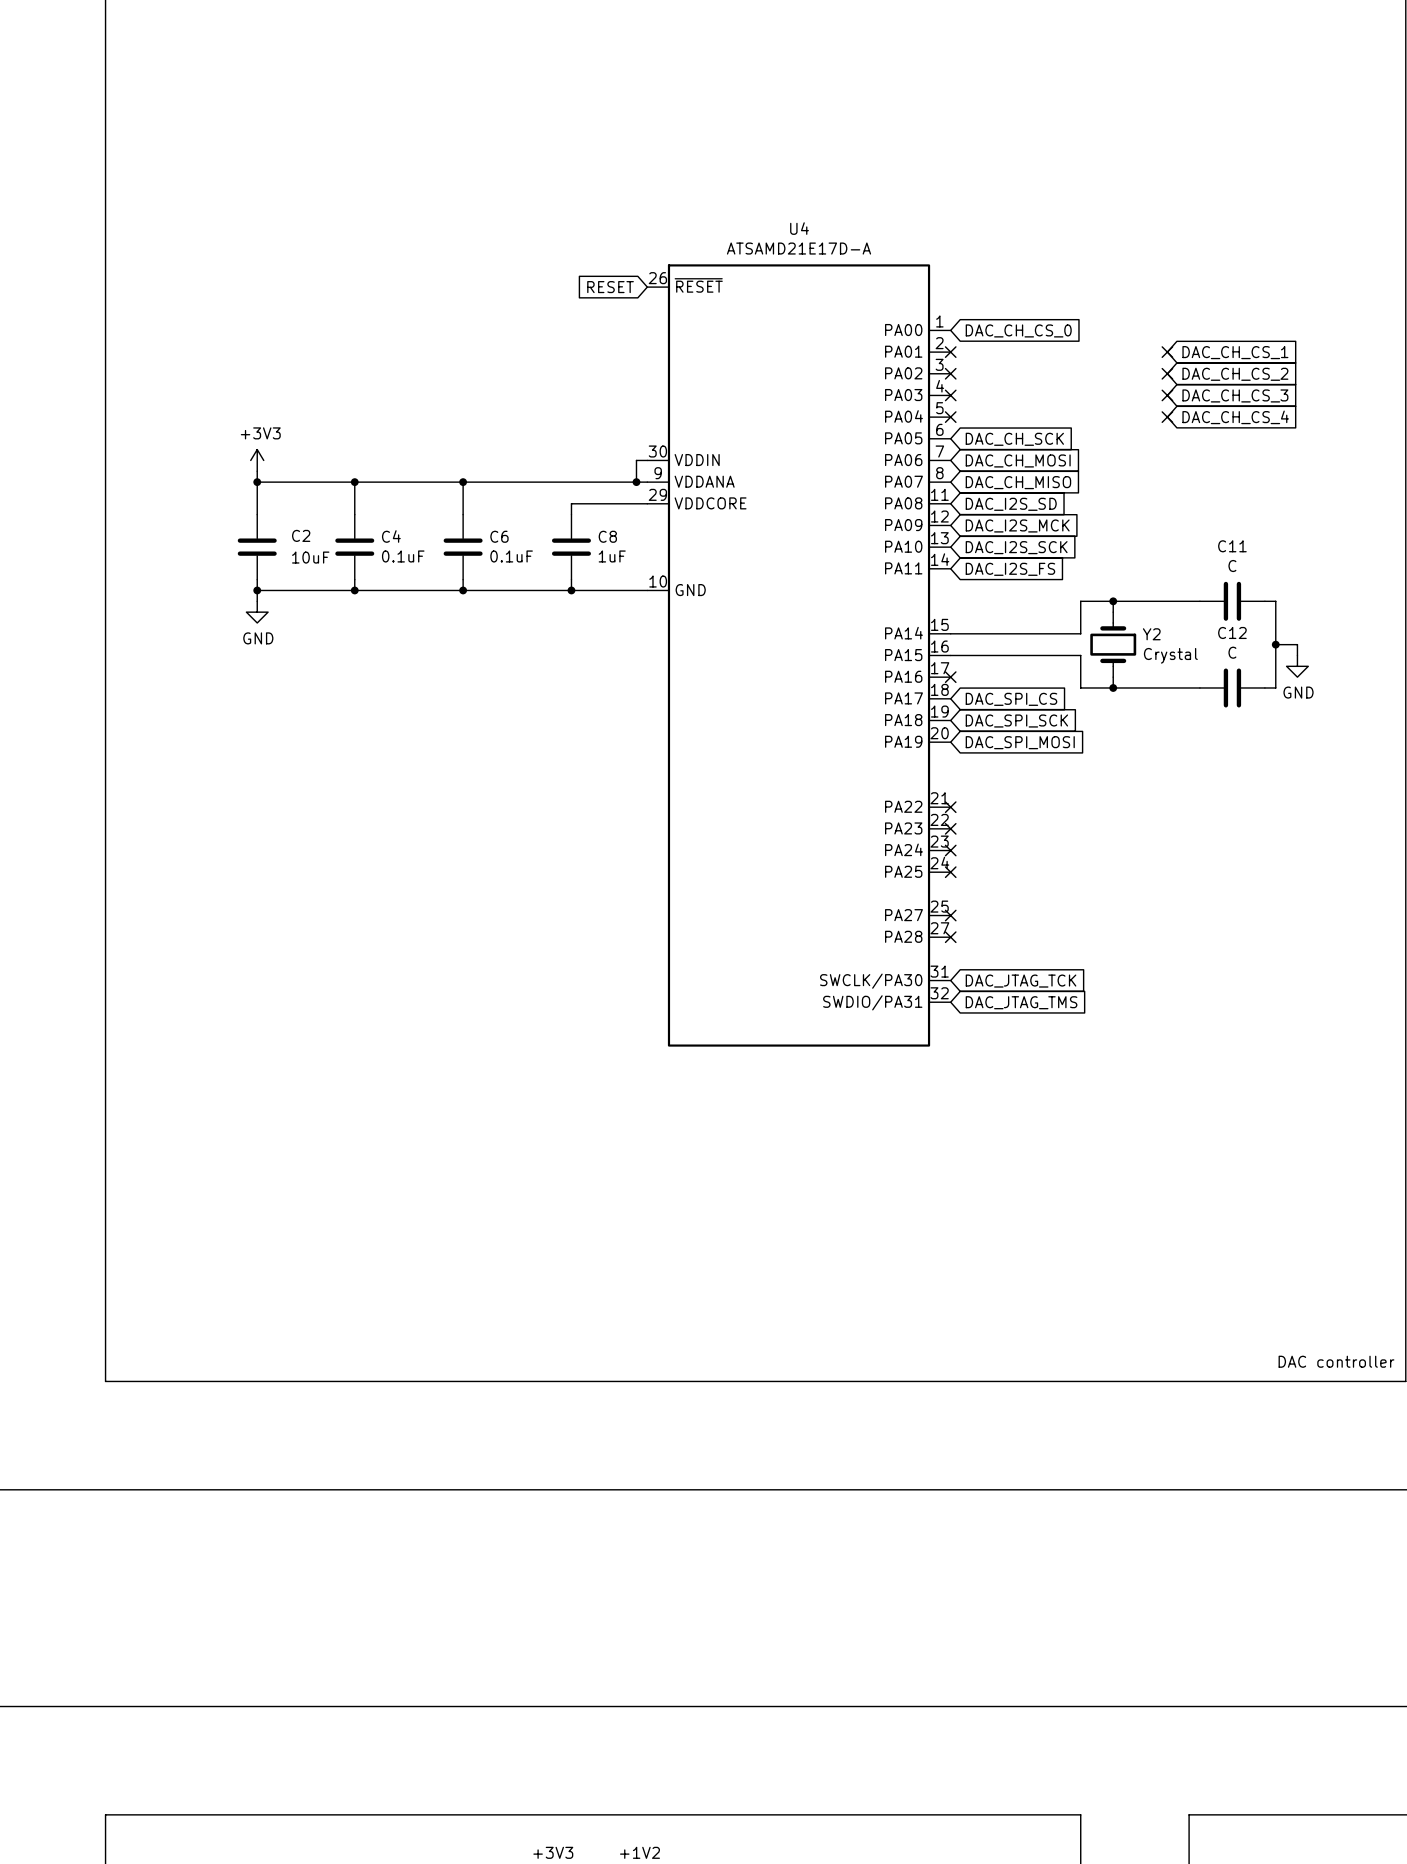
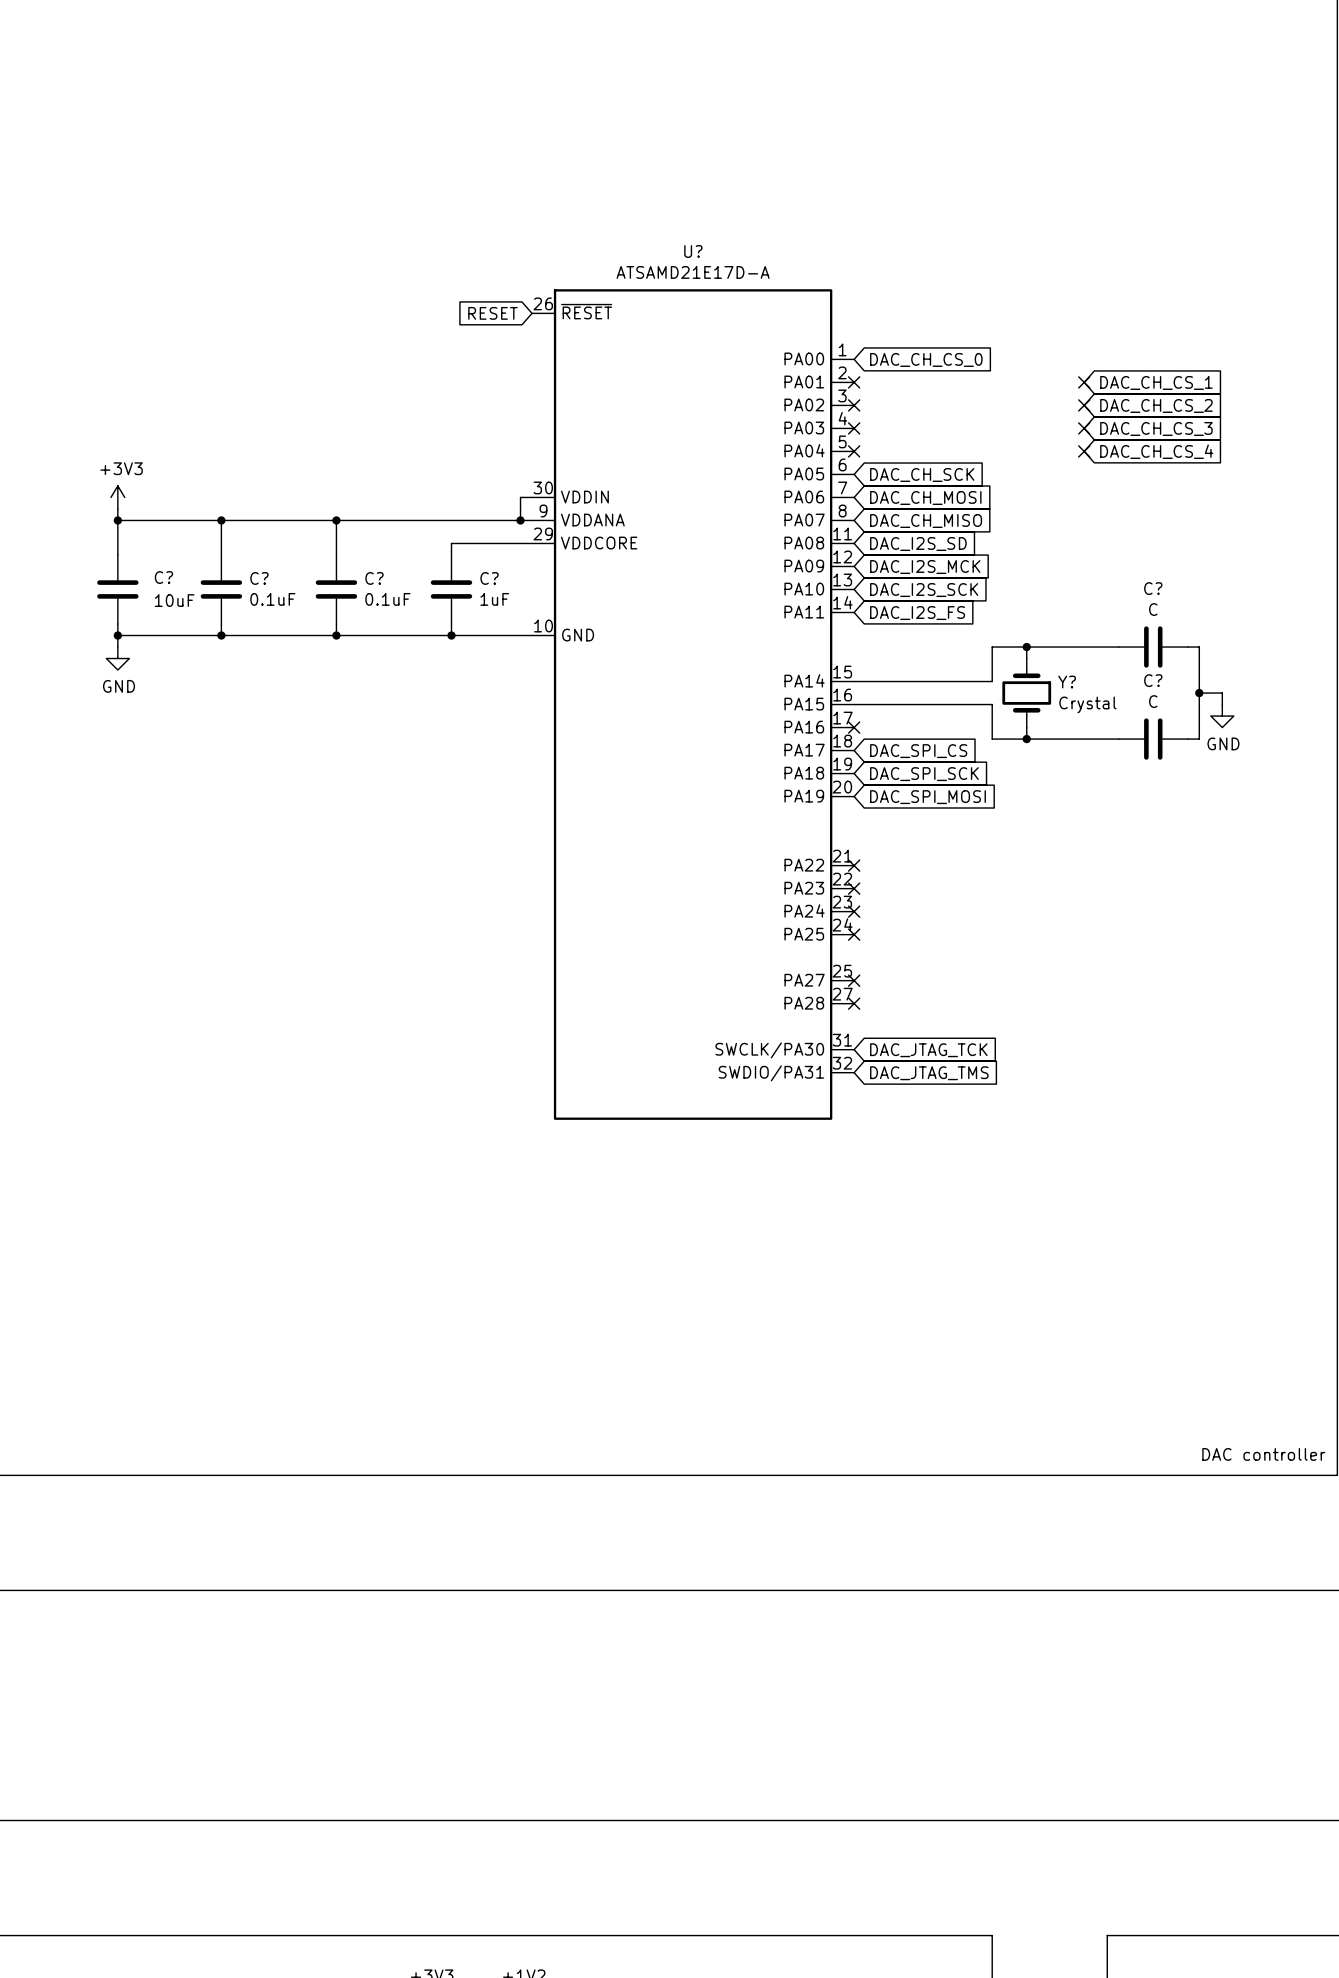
U4 name: U4 (799, 228) -> U? (693, 251)
C2 name: C2 (301, 535) -> C? (163, 577)
C4 name: C4 (391, 536) -> C? (259, 578)
C6 name: C6 (499, 536) -> C? (374, 578)
C8 name: C8 (607, 536) -> C? (489, 578)
C11 name: C11 (1232, 546) -> C? (1153, 588)
C12 name: C12 (1232, 632) -> C? (1153, 680)
Y2 name: Y2 (1151, 634) -> Y? (1067, 682)

